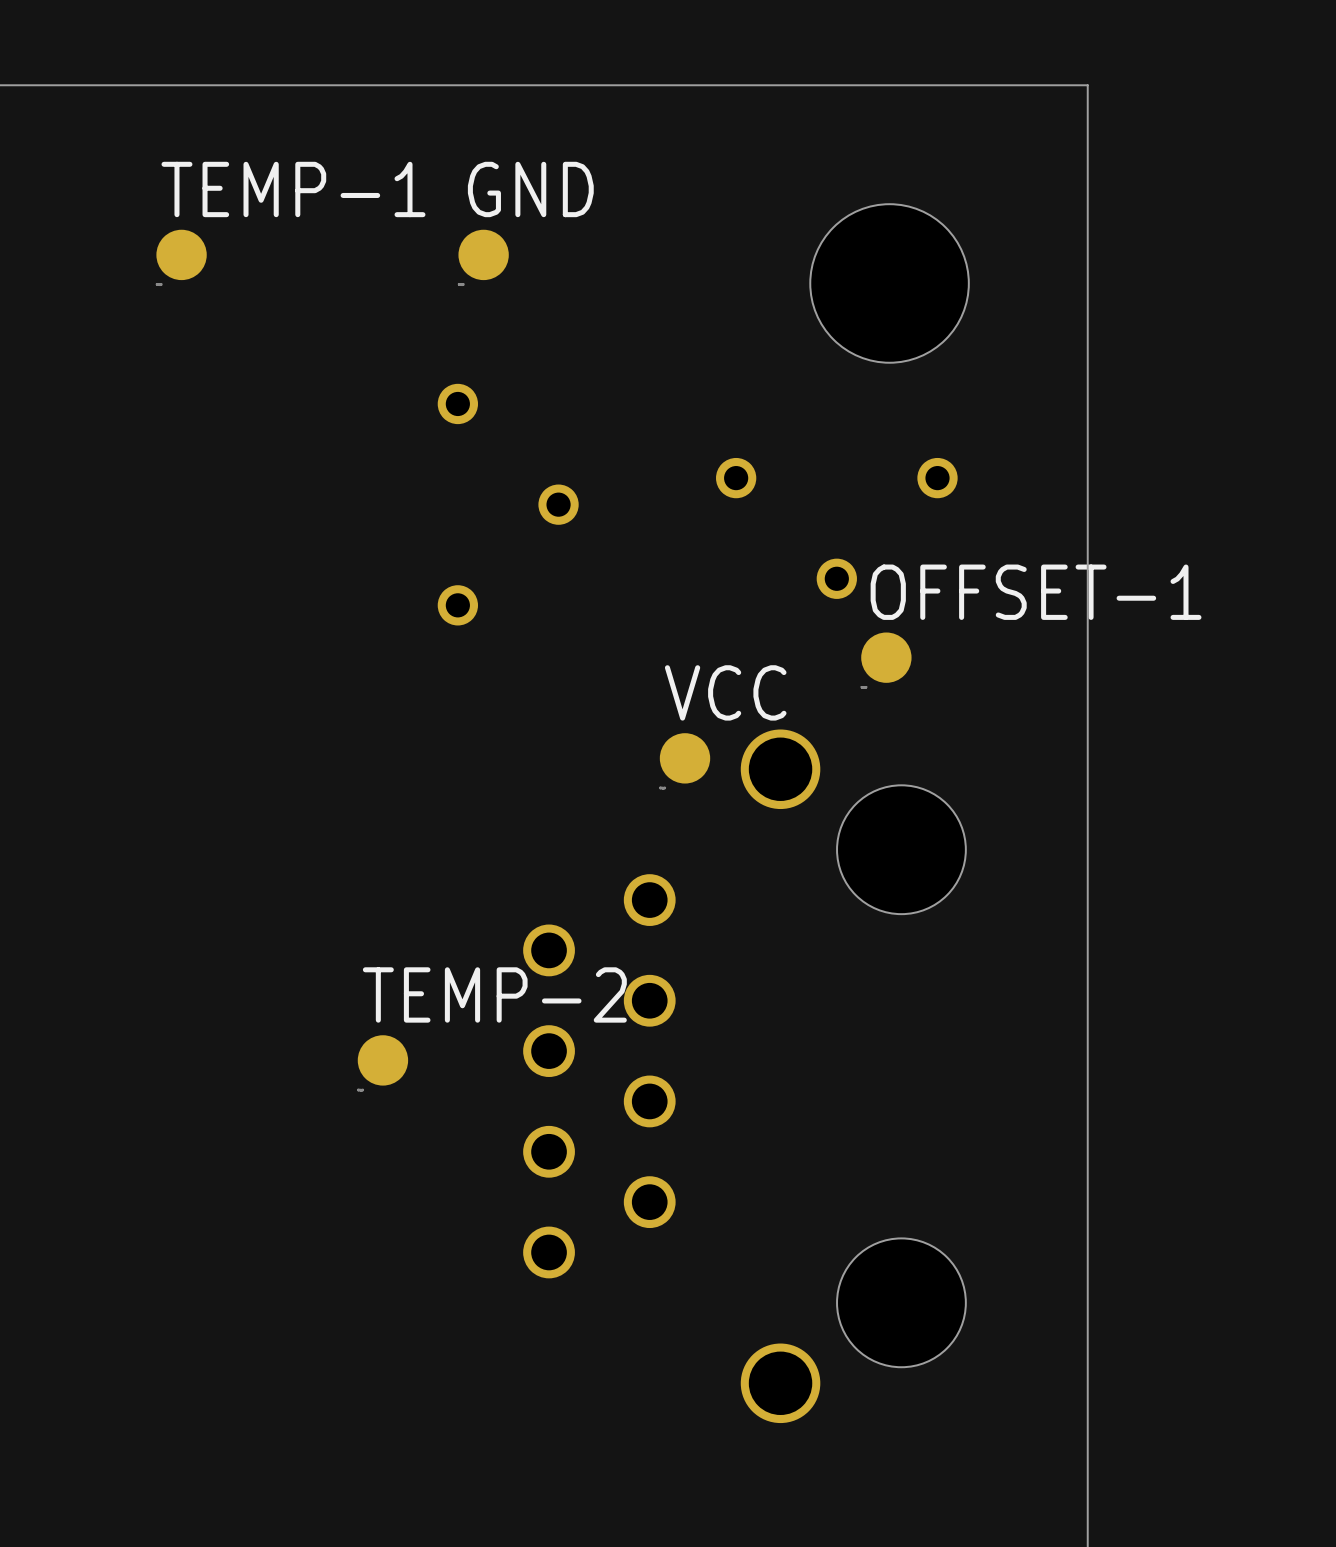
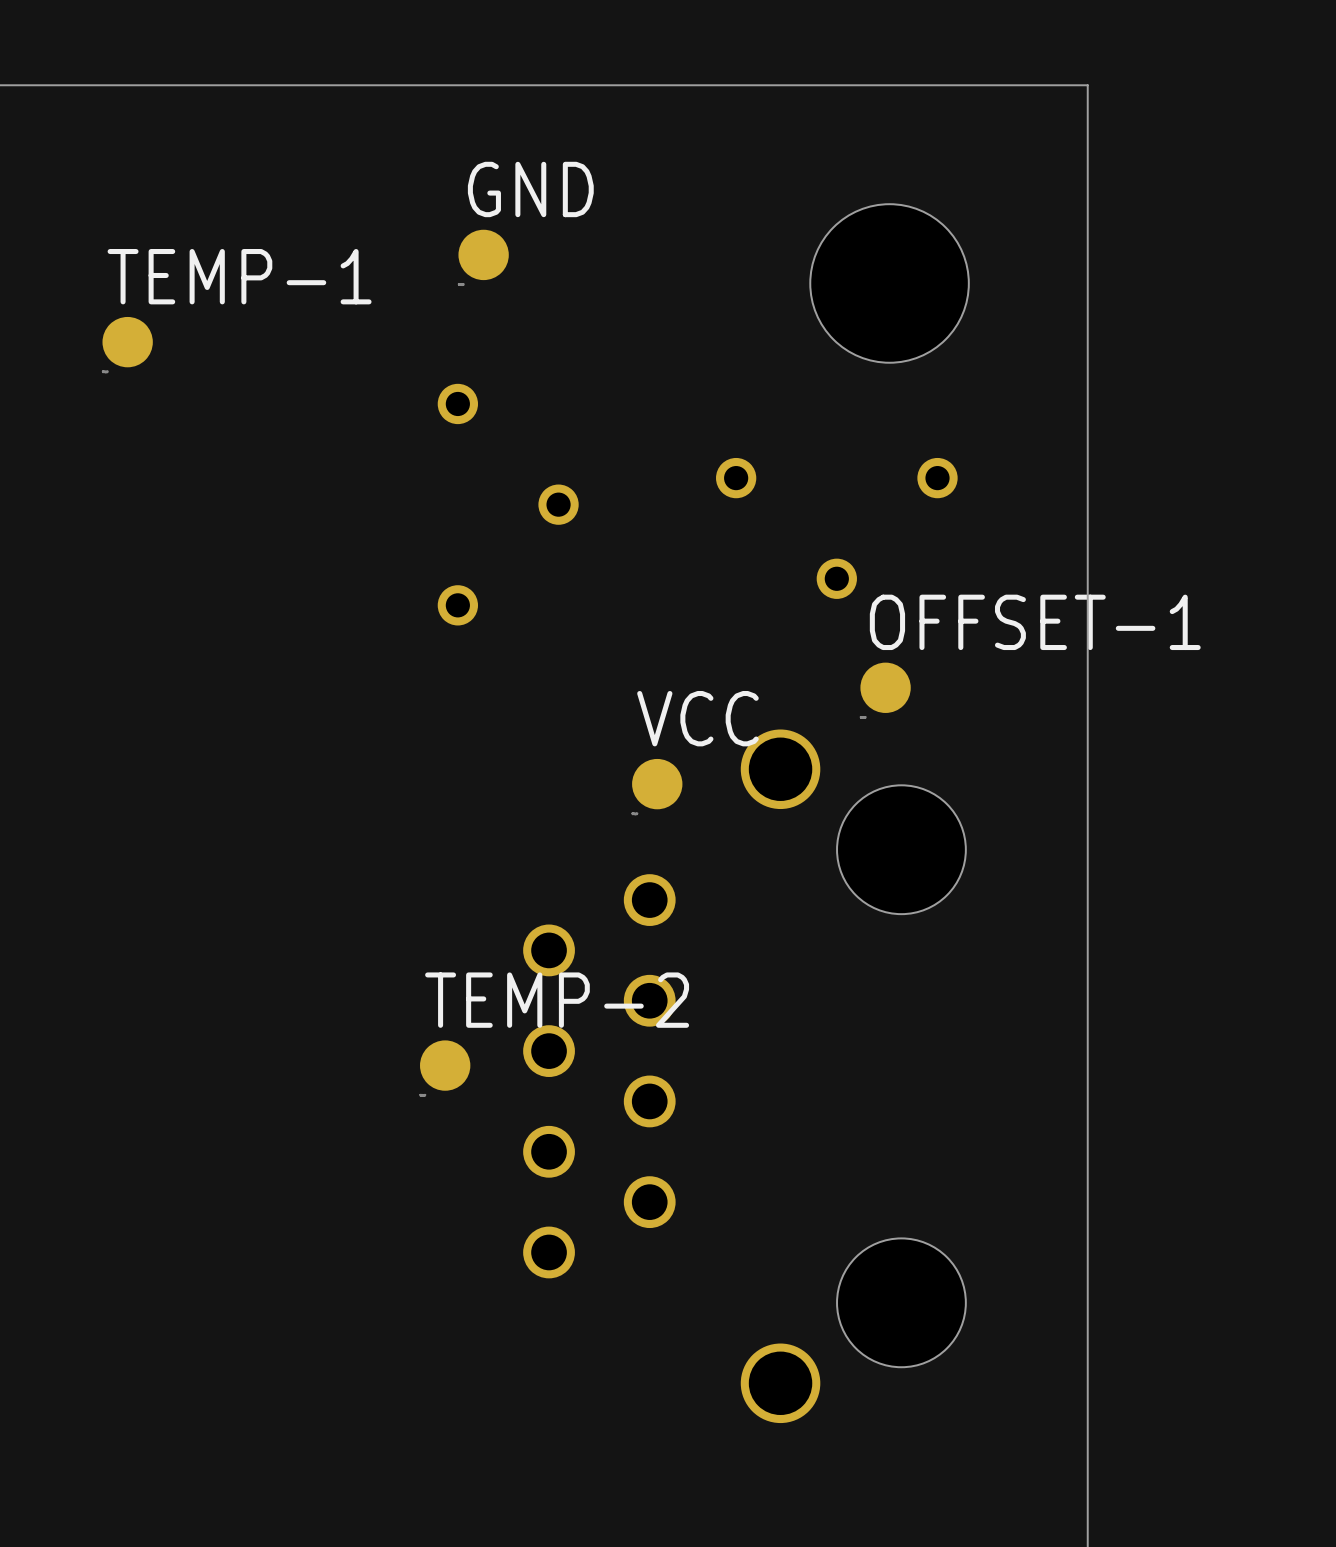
TEMP-1 position: (181, 254) -> (127, 342)
OFFSET-1 position: (886, 657) -> (885, 687)
VCC position: (685, 758) -> (657, 784)
TEMP-2 position: (382, 1060) -> (445, 1065)

